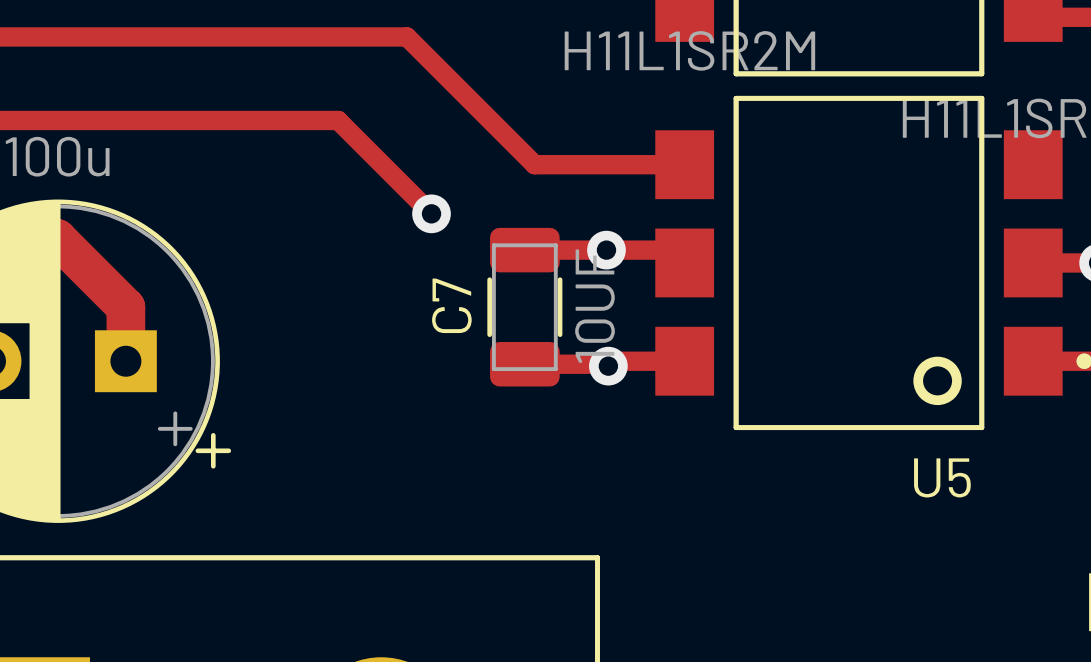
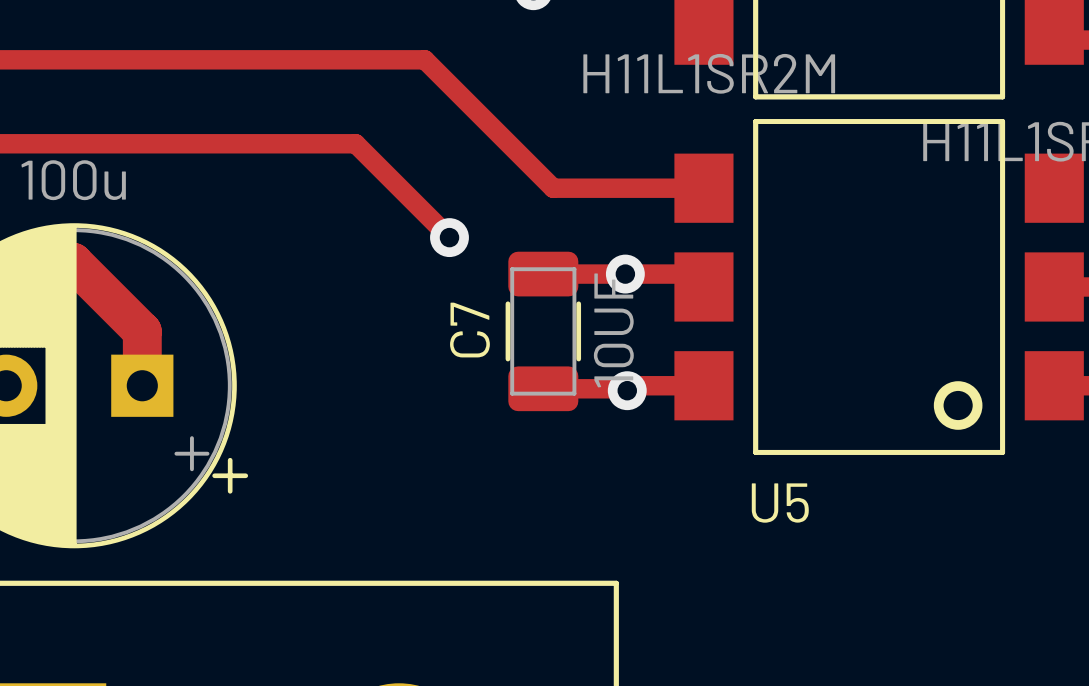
U5 name position: U5 (942, 477) -> U5 (780, 503)

